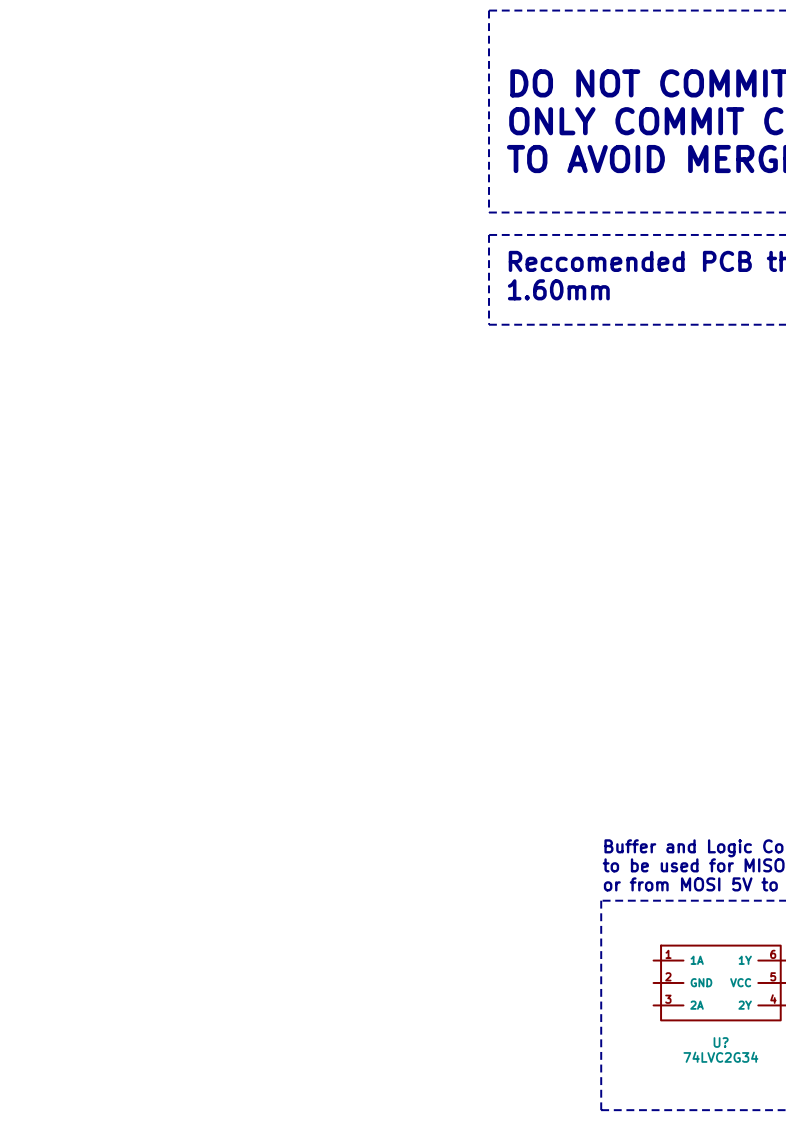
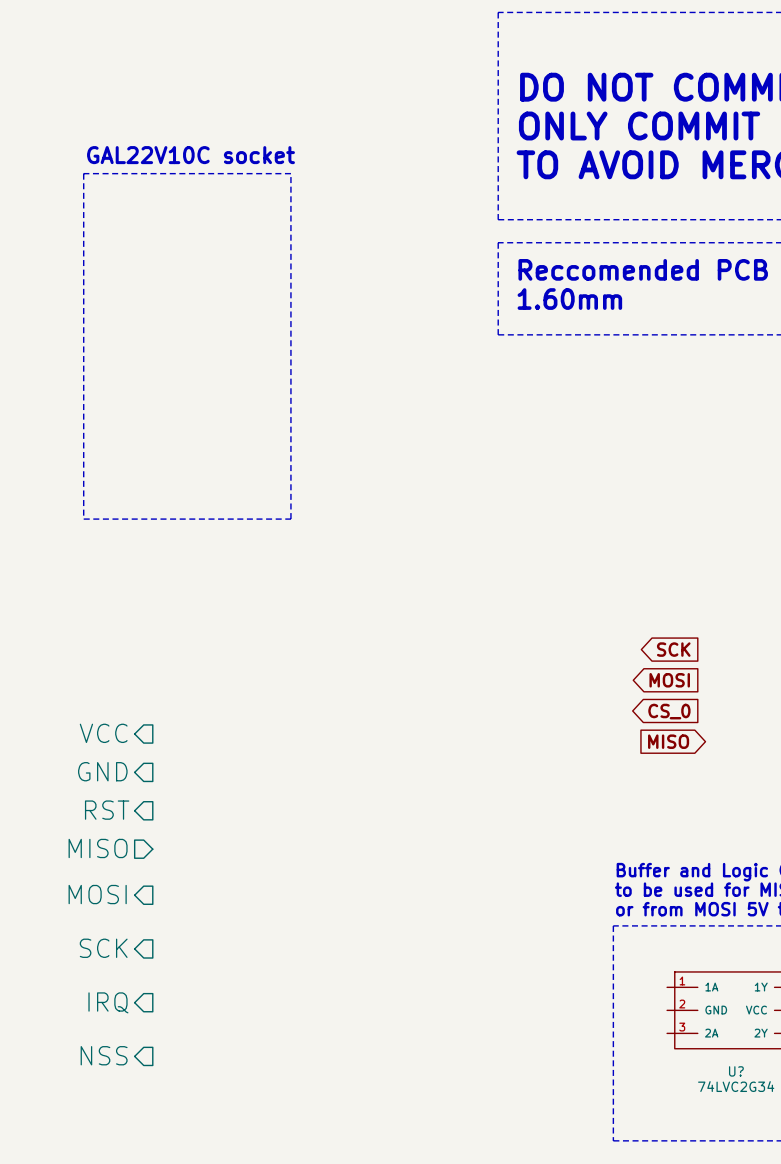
text: none -> GAL22V10C socket (191, 155)
line: none -> (83, 173) (83, 519) (290, 519) (290, 173) (83, 173)
global label: none -> SCK (673, 649)
global label: none -> MOSI (669, 680)
global label: none -> CS_0 (669, 711)
sheet pin: none -> VCC (103, 733)
global label: none -> MISO (668, 741)
sheet pin: none -> GND (102, 771)
sheet pin: none -> RST (107, 810)
sheet pin: none -> MISO (98, 848)
sheet pin: none -> MOSI (97, 894)
sheet pin: none -> SCK (103, 948)
sheet pin: none -> IRQ (108, 1002)
sheet pin: none -> NSS (104, 1055)

